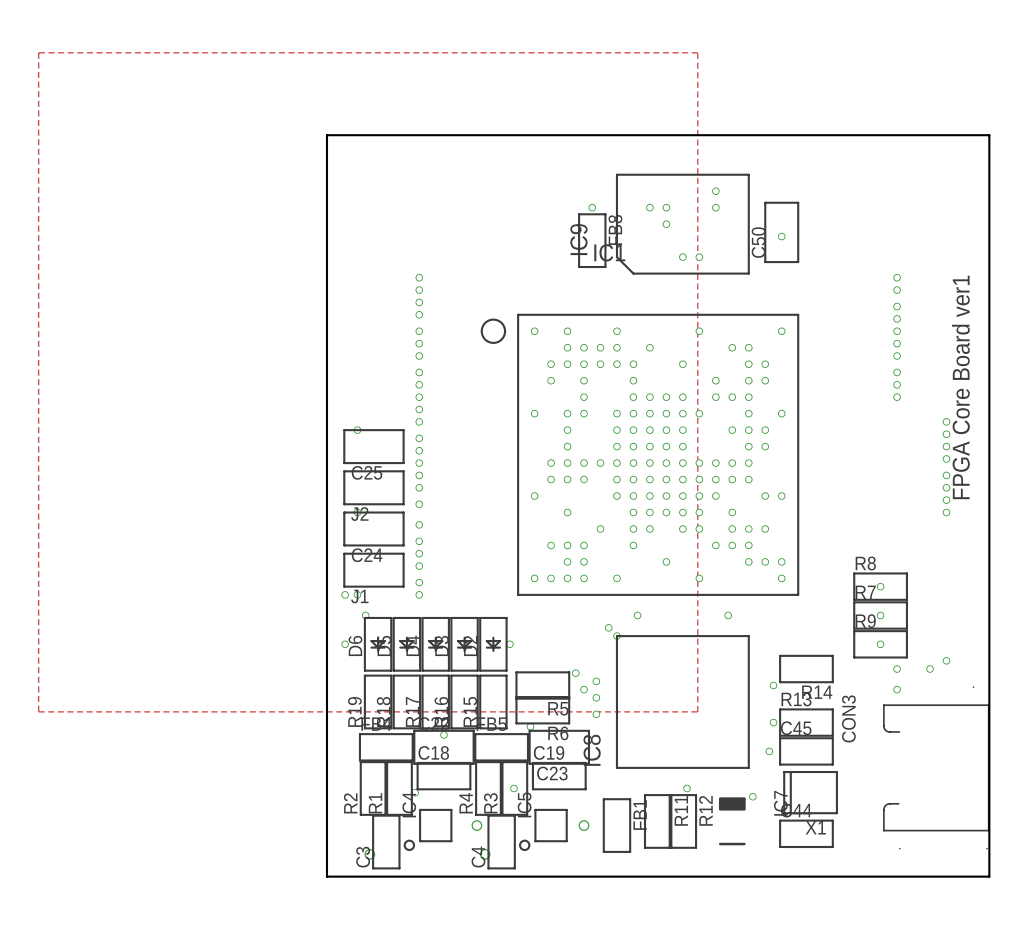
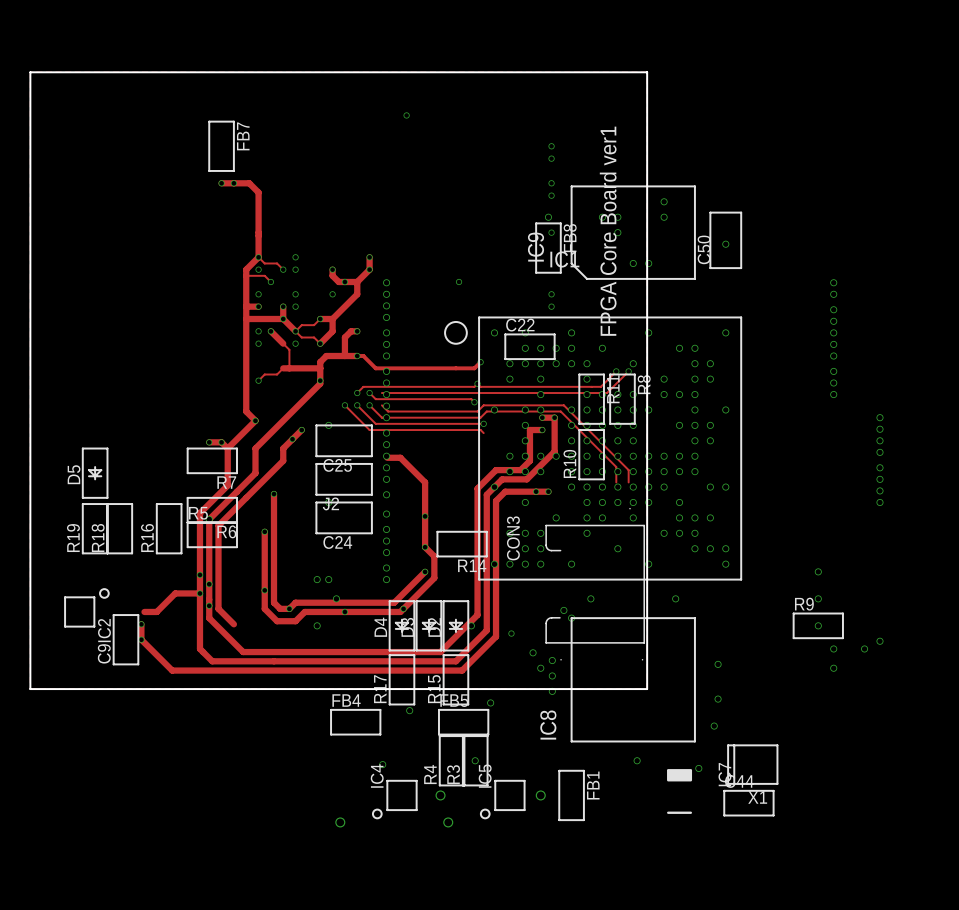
board edge: none -> (30, 72) (647, 72) (647, 689) (30, 689) (30, 72)
via: none -> (406, 115)
FB7: none -> (221, 146)
via: none -> (551, 146)
board edge: (326, 135) (989, 135) (989, 876) (326, 876) (326, 135) -> none
via: none -> (551, 158)
track: none -> (221, 183) (249, 183) (258, 192) (258, 257)
via: none -> (221, 183)
via: none -> (233, 183)
via: none -> (551, 183)
via: none -> (551, 195)
via: none -> (551, 232)
track: none -> (258, 257) (246, 269) (246, 411) (255, 420) (227, 448)
track: none -> (258, 257) (264, 263) (277, 263) (283, 269)
via: none -> (258, 257)
via: none -> (295, 257)
track: none -> (369, 257) (369, 269) (357, 281)
via: none -> (369, 257)
via: none -> (258, 269)
via: none -> (283, 269)
via: none -> (295, 269)
track: none -> (332, 269) (332, 275) (338, 281) (357, 281)
via: none -> (332, 269)
via: none -> (369, 269)
track: none -> (246, 275) (264, 275) (270, 281)
via: none -> (270, 281)
via: none -> (344, 281)
track: none -> (357, 281) (357, 294) (332, 319)
via: none -> (459, 281)
via: none -> (258, 294)
via: none -> (295, 294)
via: none -> (332, 294)
via: none -> (551, 294)
track: none -> (246, 306) (258, 306)
via: none -> (258, 306)
track: none -> (283, 306) (283, 319)
via: none -> (283, 306)
via: none -> (295, 306)
via: none -> (551, 306)
track: none -> (246, 319) (283, 319)
track: none -> (283, 319) (295, 331)
via: none -> (283, 319)
via: none -> (320, 319)
track: none -> (332, 319) (320, 319) (314, 325) (301, 325) (295, 331)
track: none -> (332, 319) (332, 331) (320, 343) (314, 337) (301, 337) (295, 331)
via: none -> (258, 331)
track: none -> (270, 331) (289, 349) (289, 368)
via: none -> (270, 331)
via: none -> (295, 331)
track: none -> (357, 331) (351, 331) (344, 337) (344, 356)
via: none -> (357, 331)
via: none -> (258, 343)
via: none -> (295, 343)
via: none -> (320, 343)
via: none -> (357, 356)
track: none -> (480, 362) (474, 368) (375, 368) (363, 356) (326, 356) (320, 362) (320, 383) (255, 448) (255, 473) (209, 519) (209, 618) (243, 652) (440, 652) (477, 615) (477, 488) (496, 470) (520, 470) (529, 460) (529, 430) (542, 430)
via: none -> (480, 362)
track: none -> (320, 368) (283, 368) (277, 374) (264, 374) (258, 380)
track: none -> (616, 371) (600, 386) (480, 386) (477, 383) (474, 386) (363, 386) (357, 393)
via: none -> (616, 371)
track: none -> (628, 371) (607, 393) (381, 393)
via: none -> (628, 371)
via: none -> (258, 380)
via: none -> (320, 380)
via: none -> (477, 383)
text position: FPGA Core Board ver1 (960, 387) -> FPGA Core Board ver1 (608, 231)
via: none -> (357, 393)
track: none -> (369, 393) (375, 399) (471, 399) (474, 402)
via: none -> (369, 393)
via: none -> (474, 402)
track: none -> (344, 405) (369, 430) (480, 430) (483, 433)
via: none -> (344, 405)
track: none -> (357, 405) (375, 423) (483, 423)
via: none -> (357, 405)
track: none -> (369, 405) (381, 417) (480, 417) (486, 411) (560, 411) (616, 467) (616, 482)
via: none -> (369, 405)
track: none -> (381, 405) (388, 411) (477, 411) (483, 405) (563, 405) (628, 470) (628, 482)
track: none -> (542, 417) (554, 417) (554, 451) (526, 479) (502, 479) (486, 494) (486, 630) (455, 661) (212, 661) (199, 648) (199, 513) (227, 485) (227, 448)
via: none -> (542, 417)
via: none -> (554, 417)
via: none -> (255, 420)
via: none -> (483, 423)
track: none -> (301, 430) (283, 448) (283, 460) (218, 525) (218, 608) (233, 624)
via: none -> (301, 430)
via: none -> (542, 430)
via: none -> (292, 439)
track: none -> (209, 442) (221, 442) (227, 448)
via: none -> (209, 442)
via: none -> (221, 442)
R10: none -> (591, 454)
track: none -> (387, 457) (400, 457) (425, 482) (425, 547) (434, 556) (434, 578) (400, 611) (304, 611) (295, 621) (277, 621) (264, 608) (264, 531)
via: none -> (536, 491)
track: none -> (548, 491) (505, 491) (496, 500) (496, 636) (462, 670) (172, 670) (141, 639) (141, 624)
via: none -> (548, 491)
track: none -> (274, 494) (274, 602) (280, 608) (289, 608) (295, 602) (394, 602) (425, 571)
via: none -> (274, 494)
via: none -> (425, 516)
via: (699, 528) -> none
via: none -> (209, 519)
via: none -> (264, 531)
via: none -> (425, 547)
J1: (373, 570) -> none
via: none -> (425, 571)
R8 rotation: 0° (880, 586) -> 90° clockwise (622, 399)
R8 position: (880, 586) -> (622, 399)
via: none -> (199, 574)
R7 name position: R7 (865, 592) -> R7 (226, 482)
via: none -> (209, 584)
via: none -> (264, 590)
track: none -> (199, 593) (175, 593) (156, 611) (144, 611)
via: none -> (199, 593)
R7 position: (880, 615) -> (212, 460)
via: none -> (209, 605)
IC2: none -> (86, 607)
via: none -> (289, 608)
via: none -> (403, 608)
via: none -> (344, 611)
via: none -> (141, 624)
D6: (378, 644) -> none
D5 position: (406, 644) -> (95, 473)
via: none -> (511, 633)
C9: none -> (125, 639)
via: none -> (141, 639)
R14 position: (806, 669) -> (462, 544)
R5 position: (542, 685) -> (212, 534)
R19 position: (378, 701) -> (95, 528)
R18 position: (406, 701) -> (119, 528)
R16 position: (464, 701) -> (169, 528)
R5 name position: R5 (558, 708) -> R5 (198, 513)
R6 position: (542, 710) -> (212, 510)
R13: (806, 722) -> none
C22 footprint: [413, 729, 475, 765] -> [504, 333, 556, 361]
C23: (559, 747) -> none
C45: (806, 751) -> none
CON3 position: (936, 767) -> (595, 584)
C18: (443, 776) -> none
C19: (559, 776) -> none
R2: (373, 788) -> none
R1: (398, 788) -> none
R11 position: (658, 821) -> (591, 399)
R12: (682, 821) -> none
C3: (386, 842) -> none
C4: (501, 842) -> none

